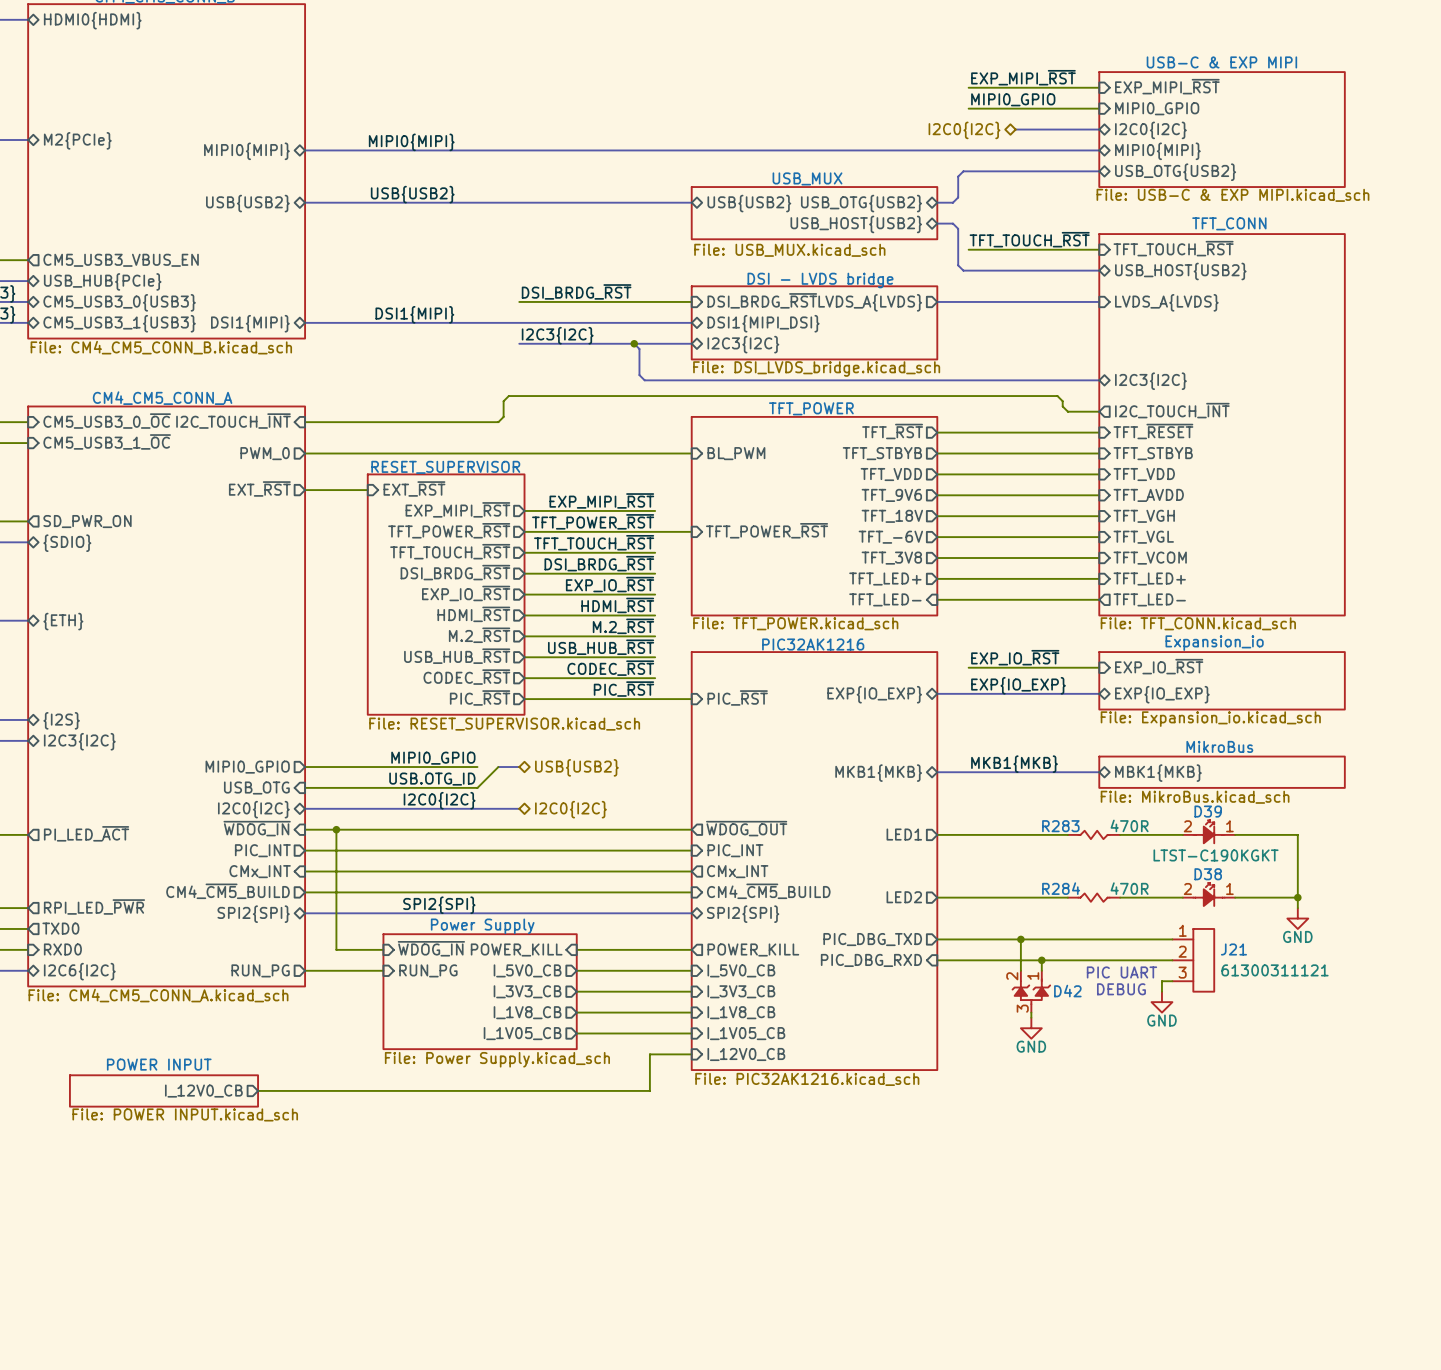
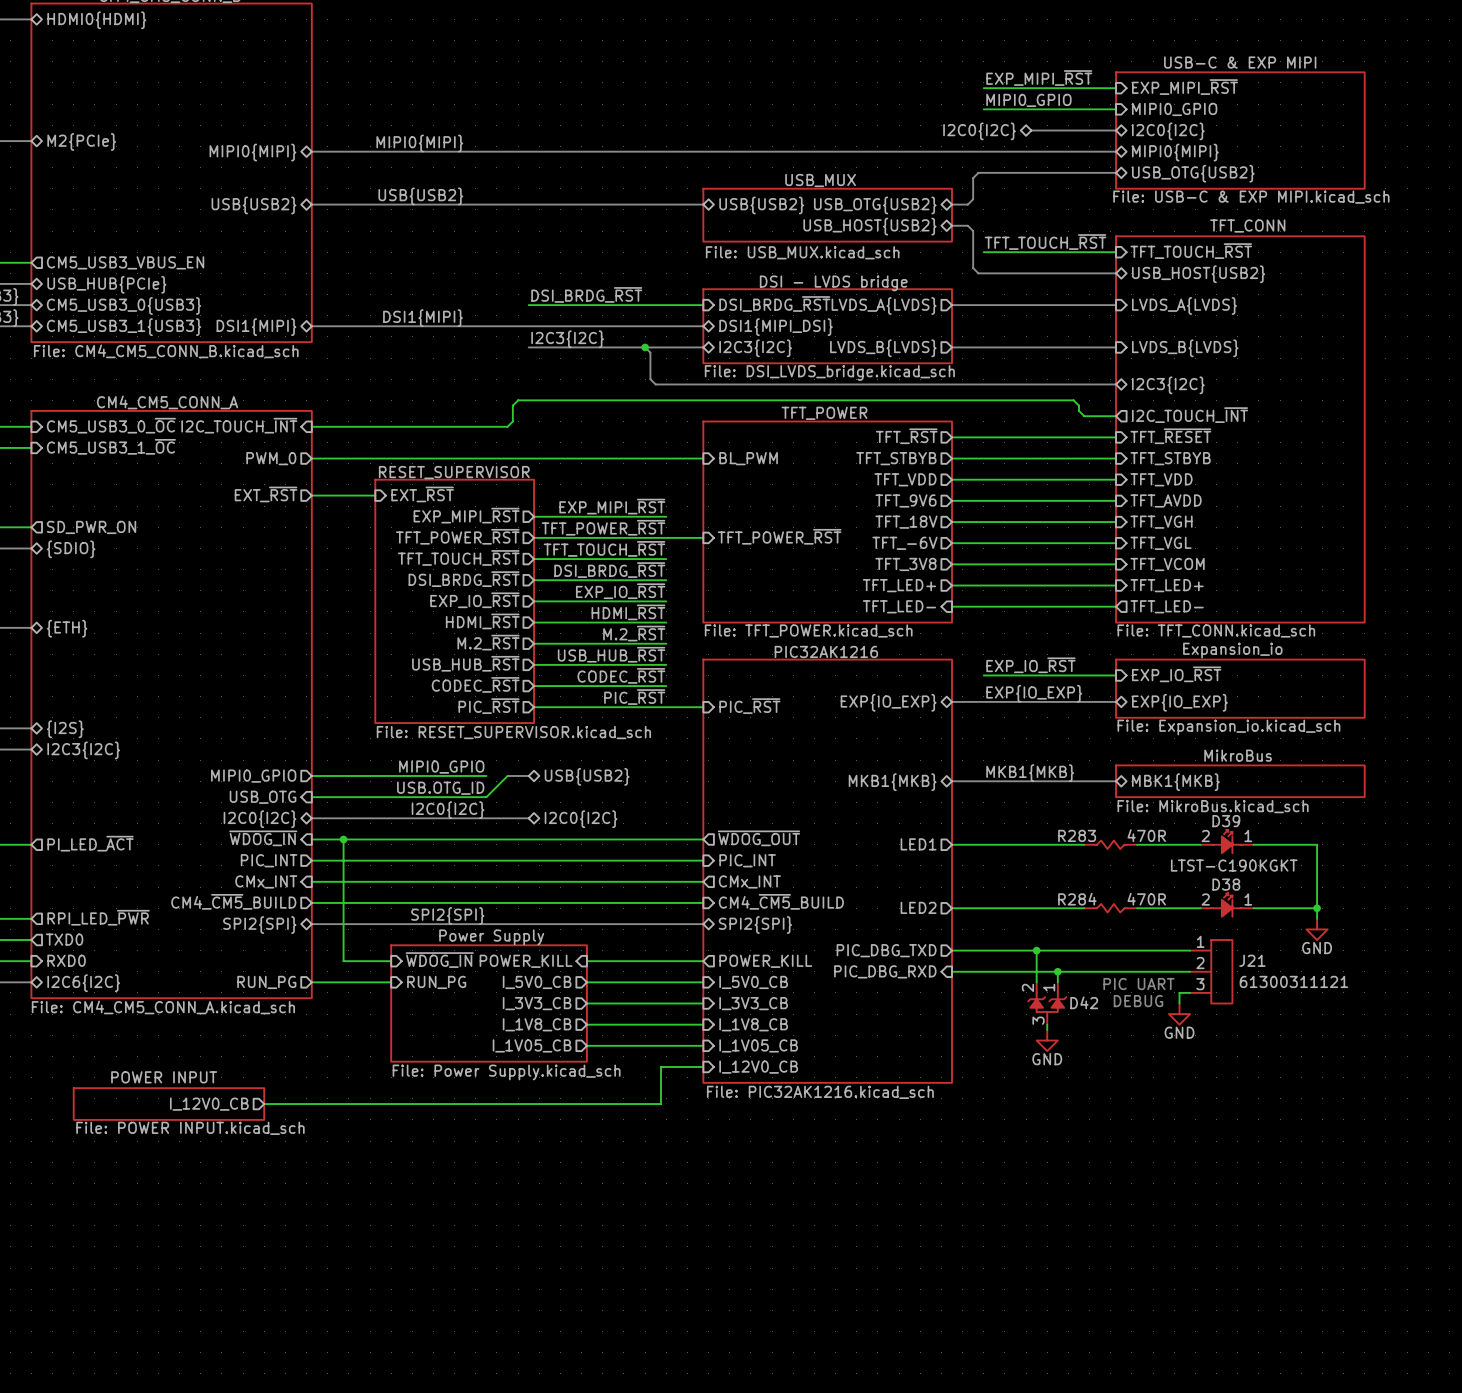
bus: none -> (952, 347) (1116, 347)
sheet pin: none -> LVDS_B{LVDS} (883, 348)
sheet pin: none -> LVDS_B{LVDS} (1185, 348)

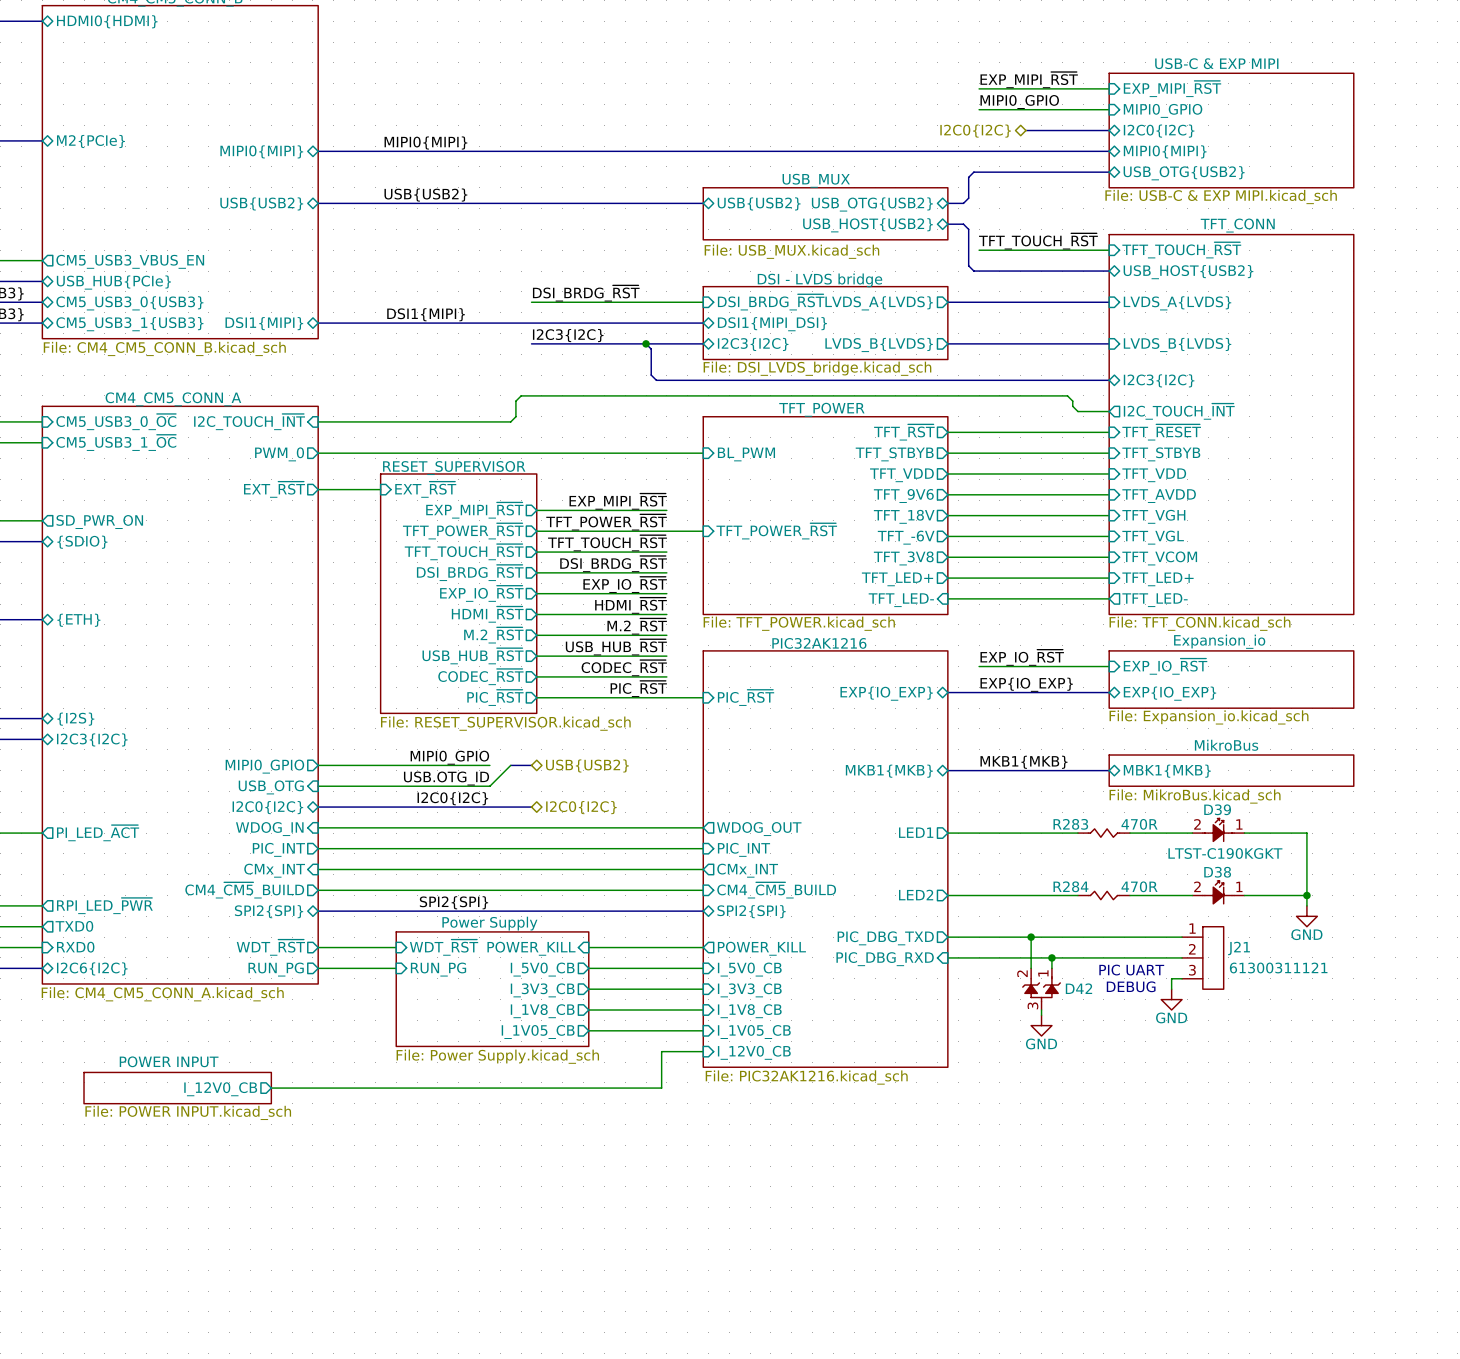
sheet pin: ~{WDOG_IN} (263, 838) -> WDOG_IN (269, 829)
sheet pin: ~{WDOG_OUT} (758, 838) -> WDOG_OUT (759, 829)
wire: (343, 839) (343, 961) -> (318, 947) (349, 947)
junction: (343, 839) -> none
sheet pin: none -> WDT_~{RST} (270, 947)
sheet pin: ~{WDOG_IN} (439, 960) -> WDT_~{RST} (444, 947)

